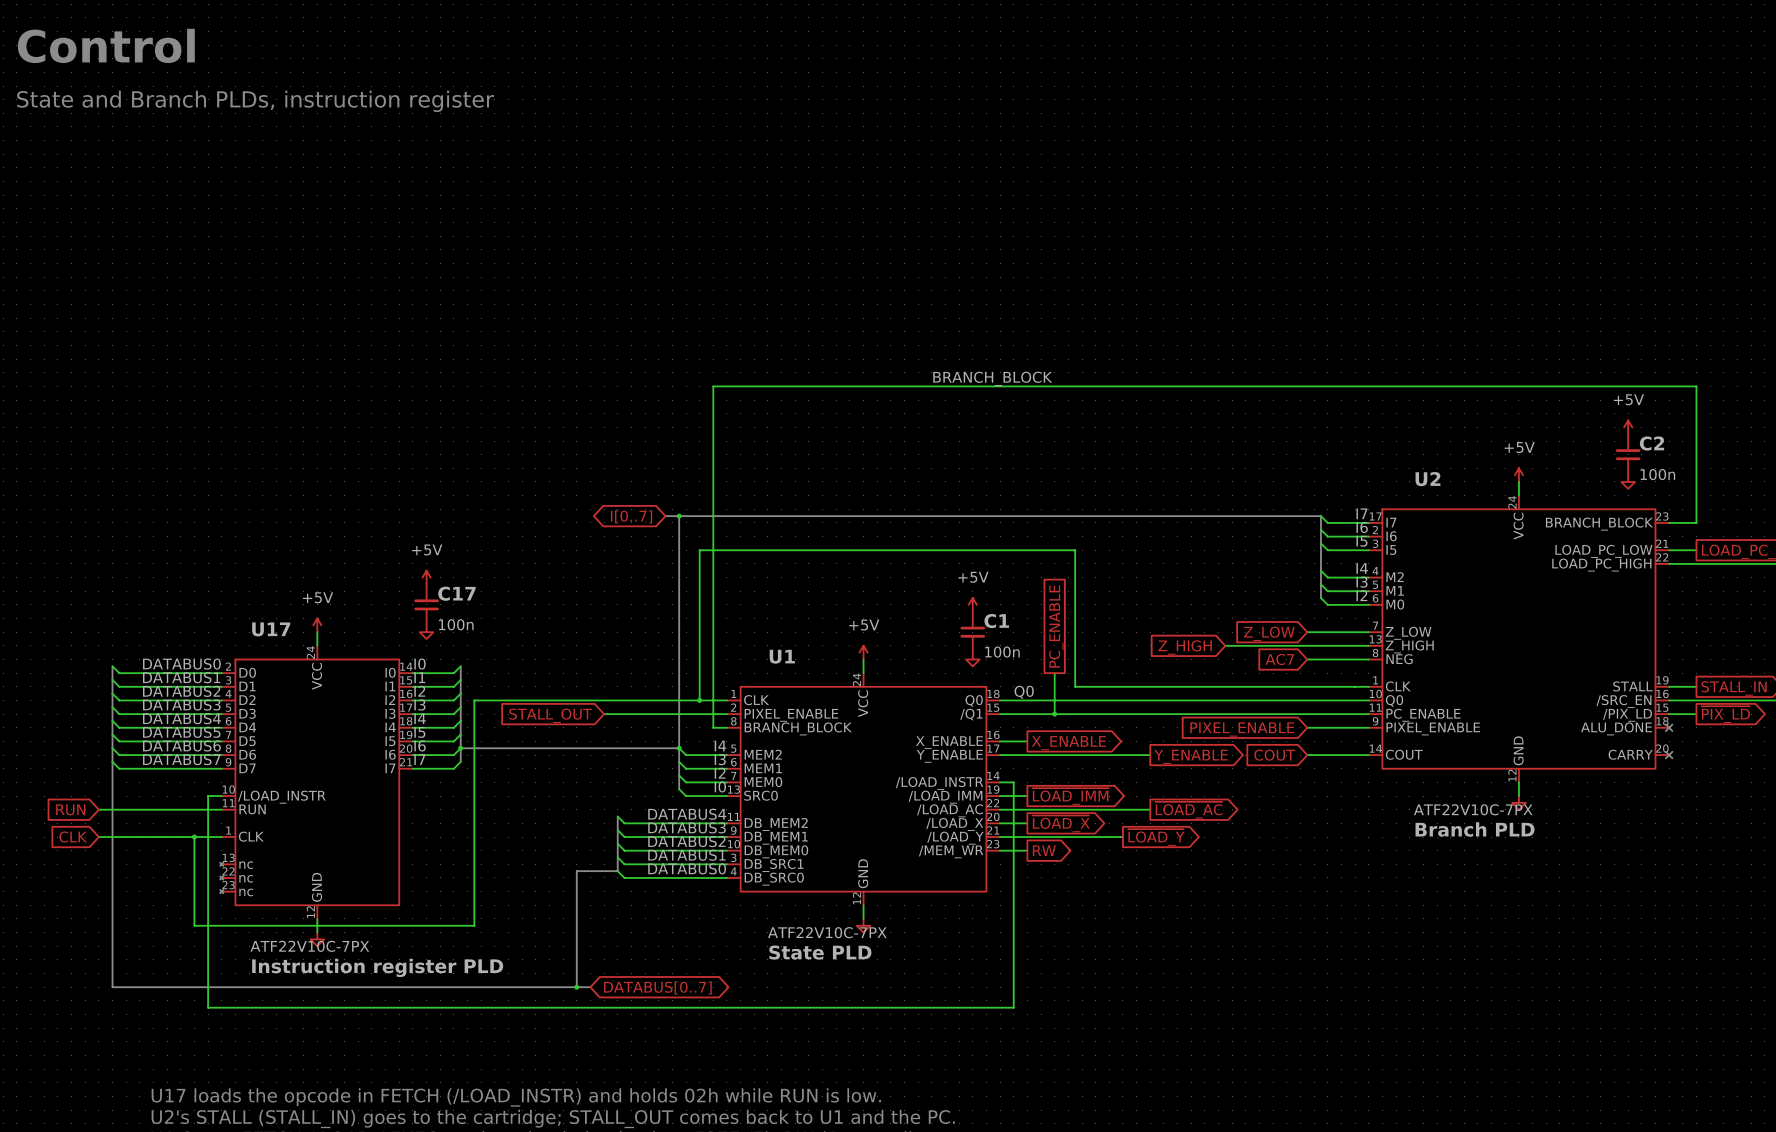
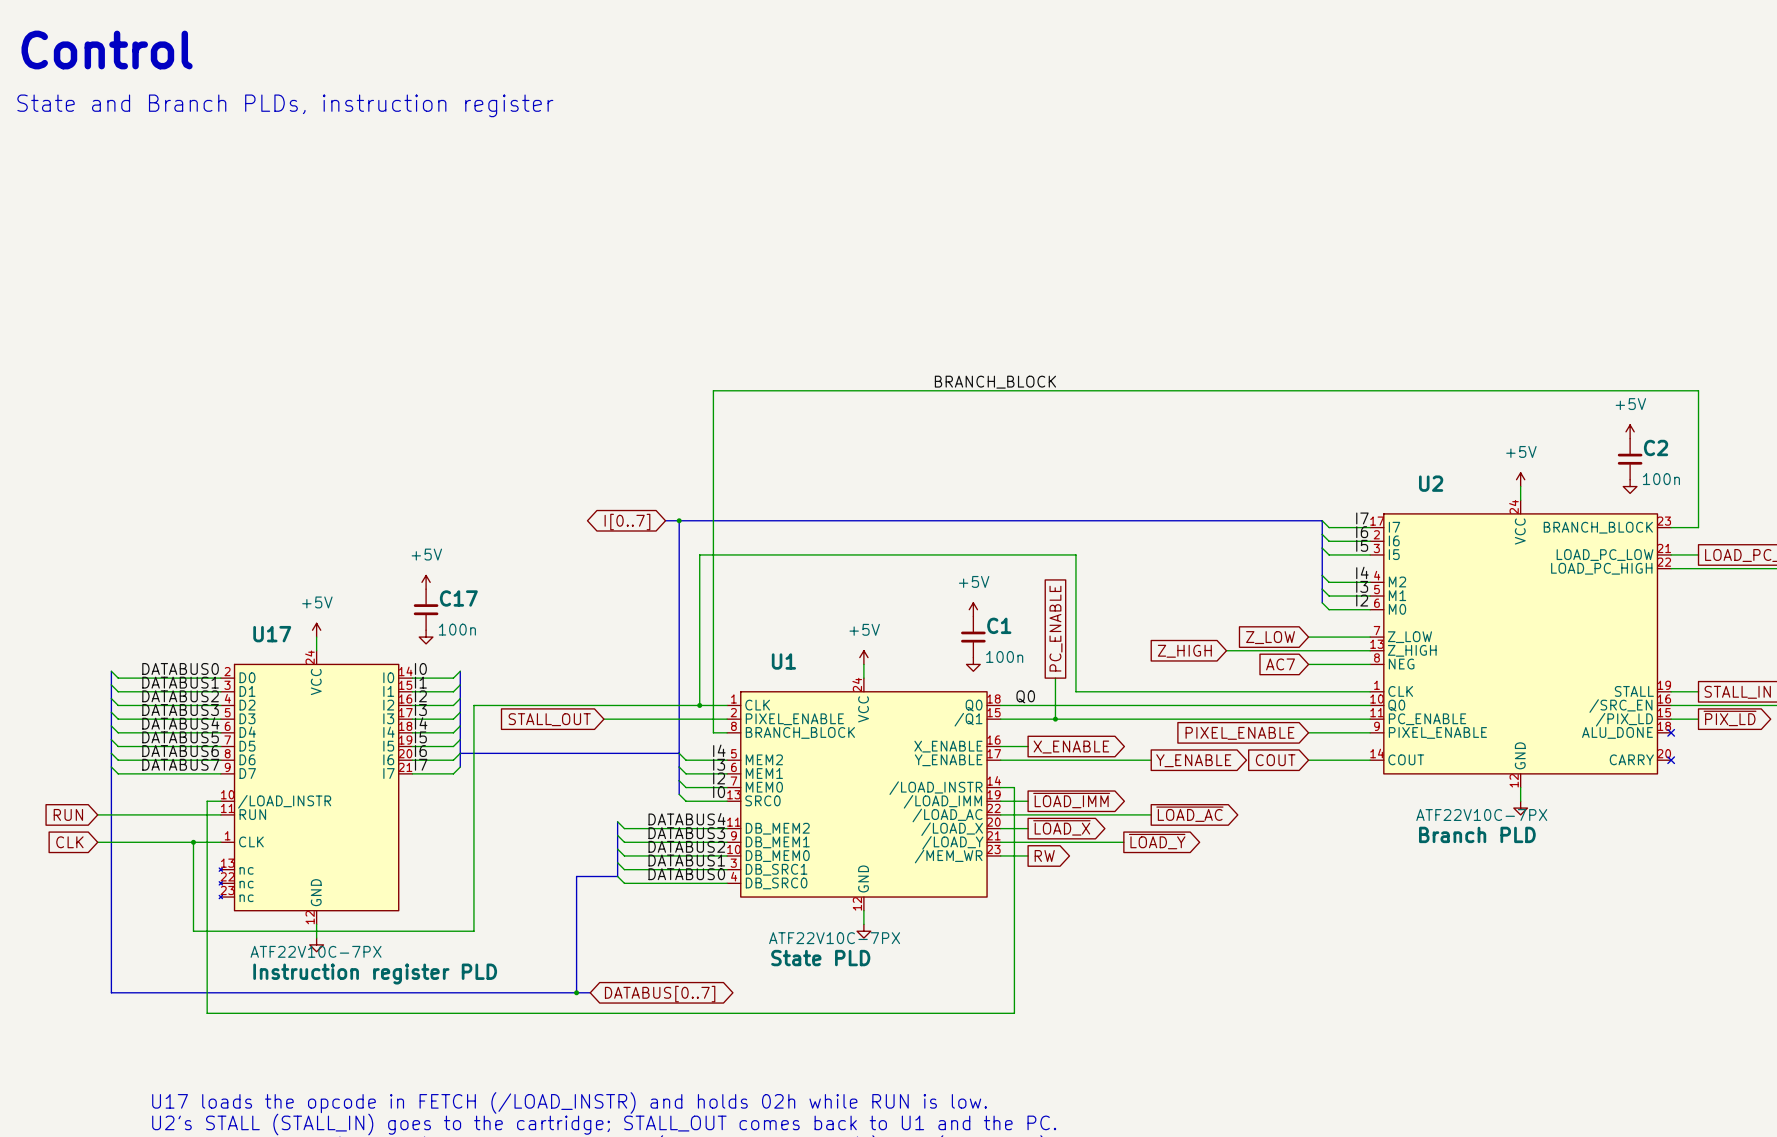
junction: (460, 748) -> none
junction: (679, 748) -> none

